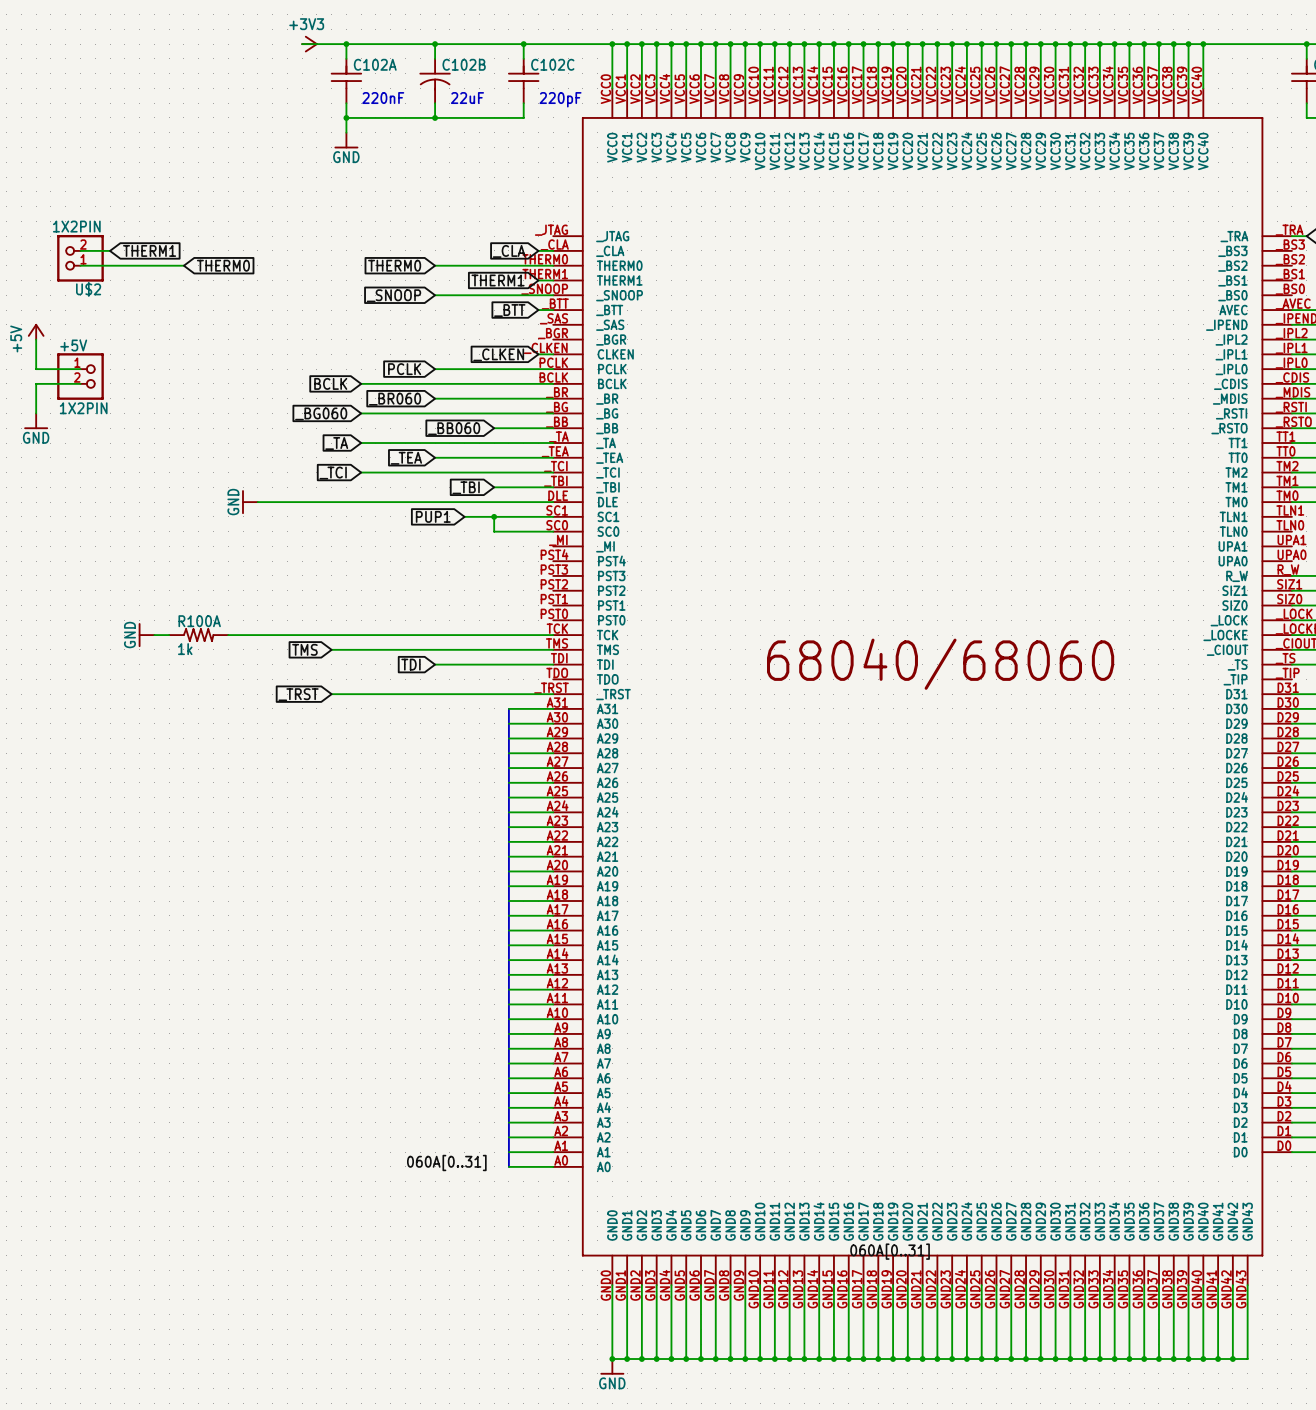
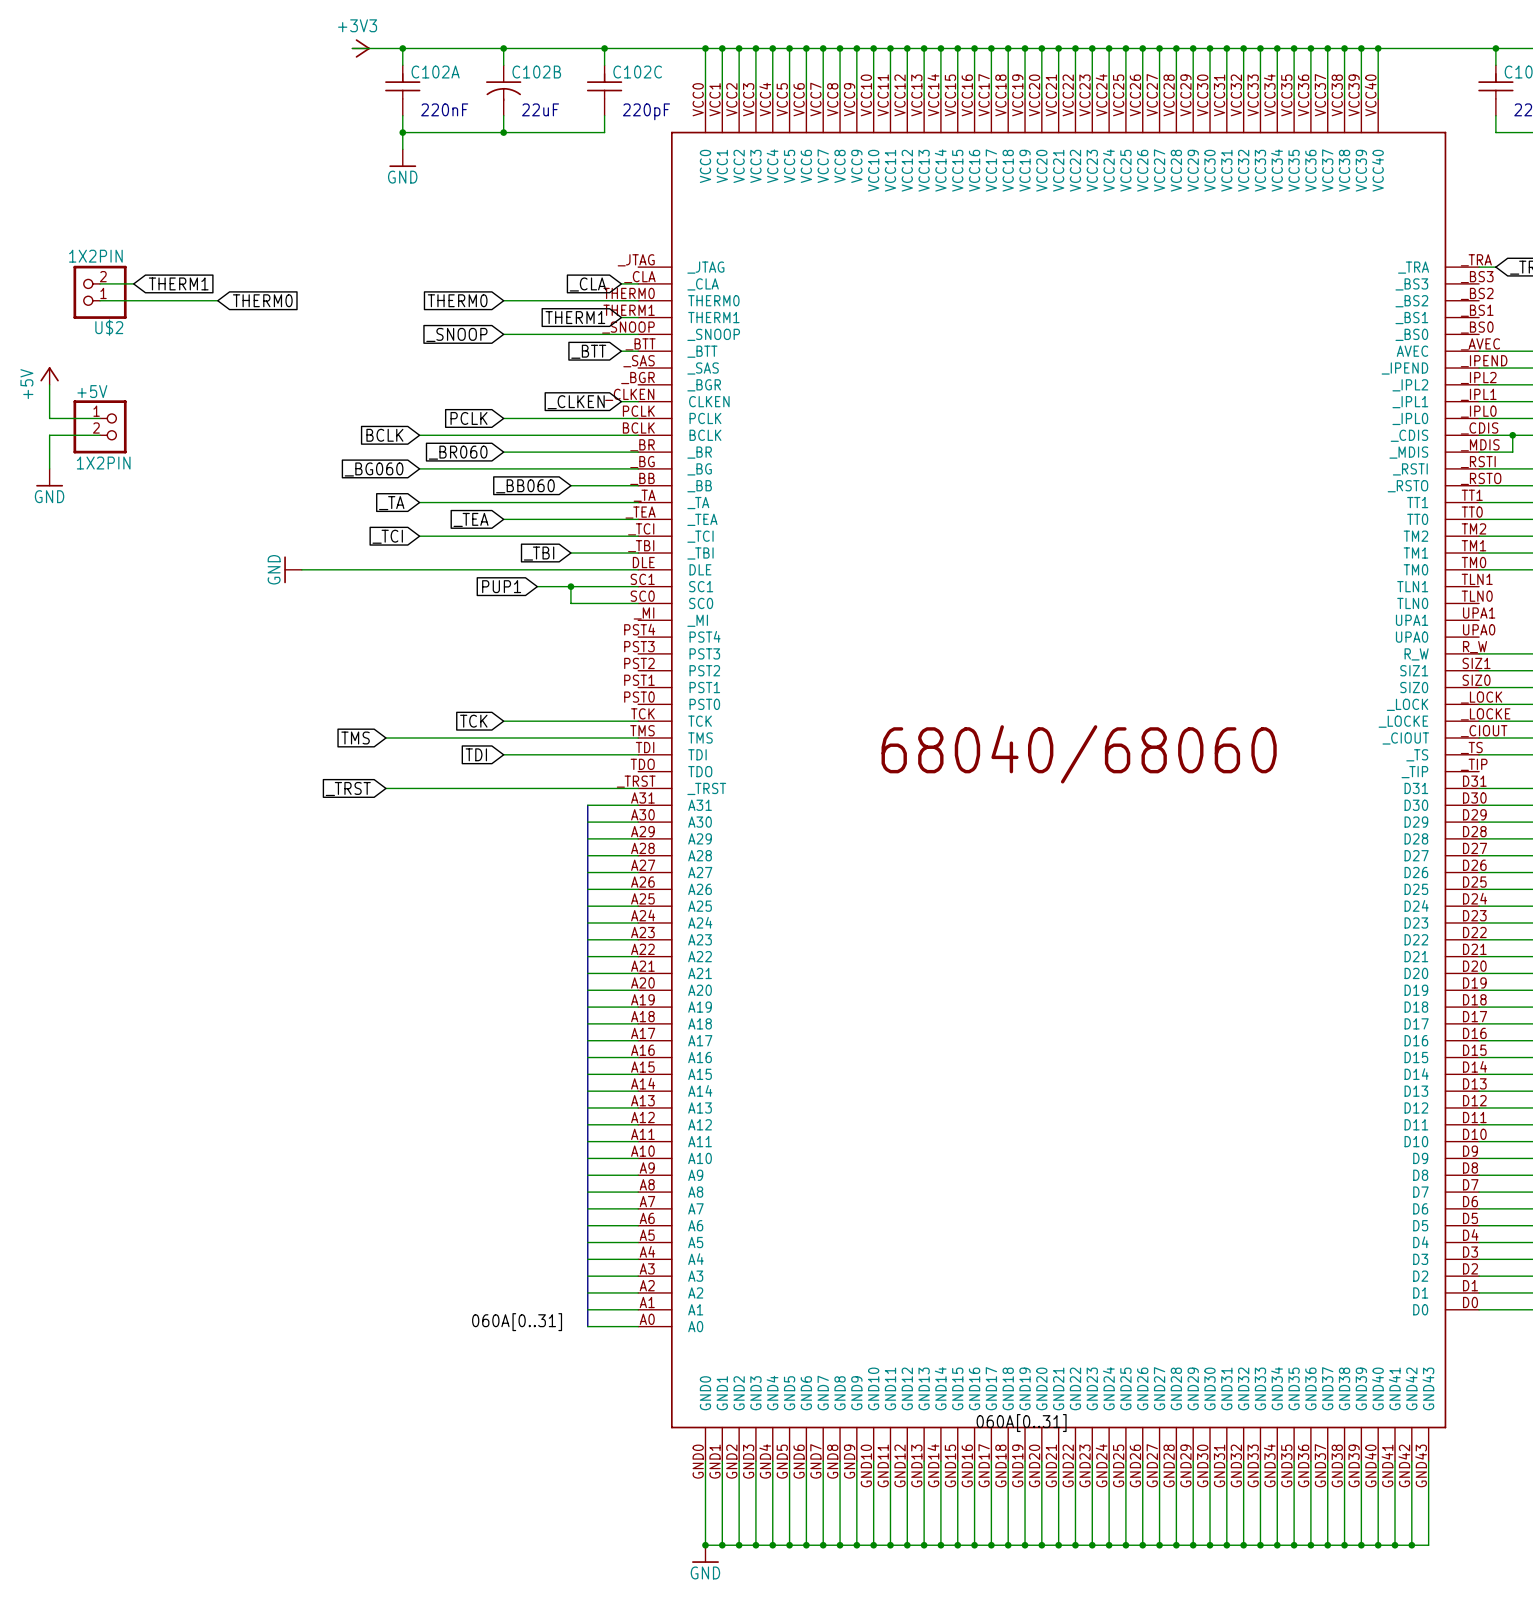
power symbol: GND (146, 635) -> none
wire: (154, 635) (169, 635) -> none
R100A: 1k (198, 635) -> none
wire: (228, 635) (435, 635) -> none
global label: none -> TCK (473, 721)

